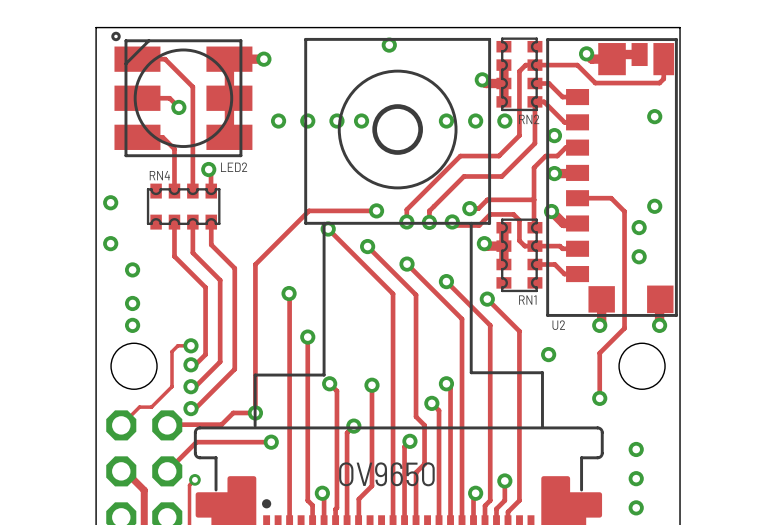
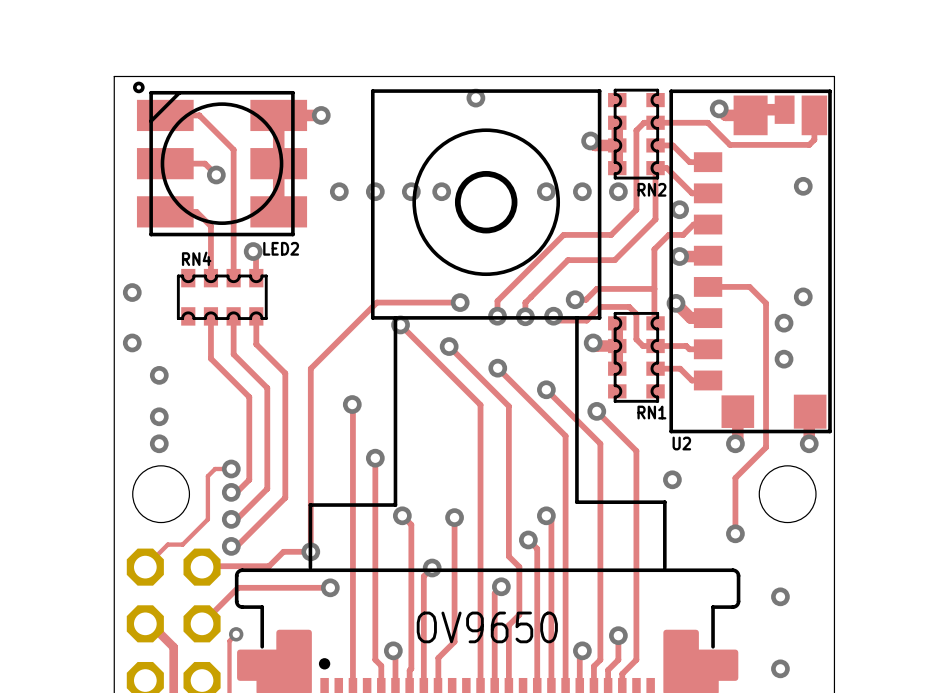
via: (636, 478) -> none

